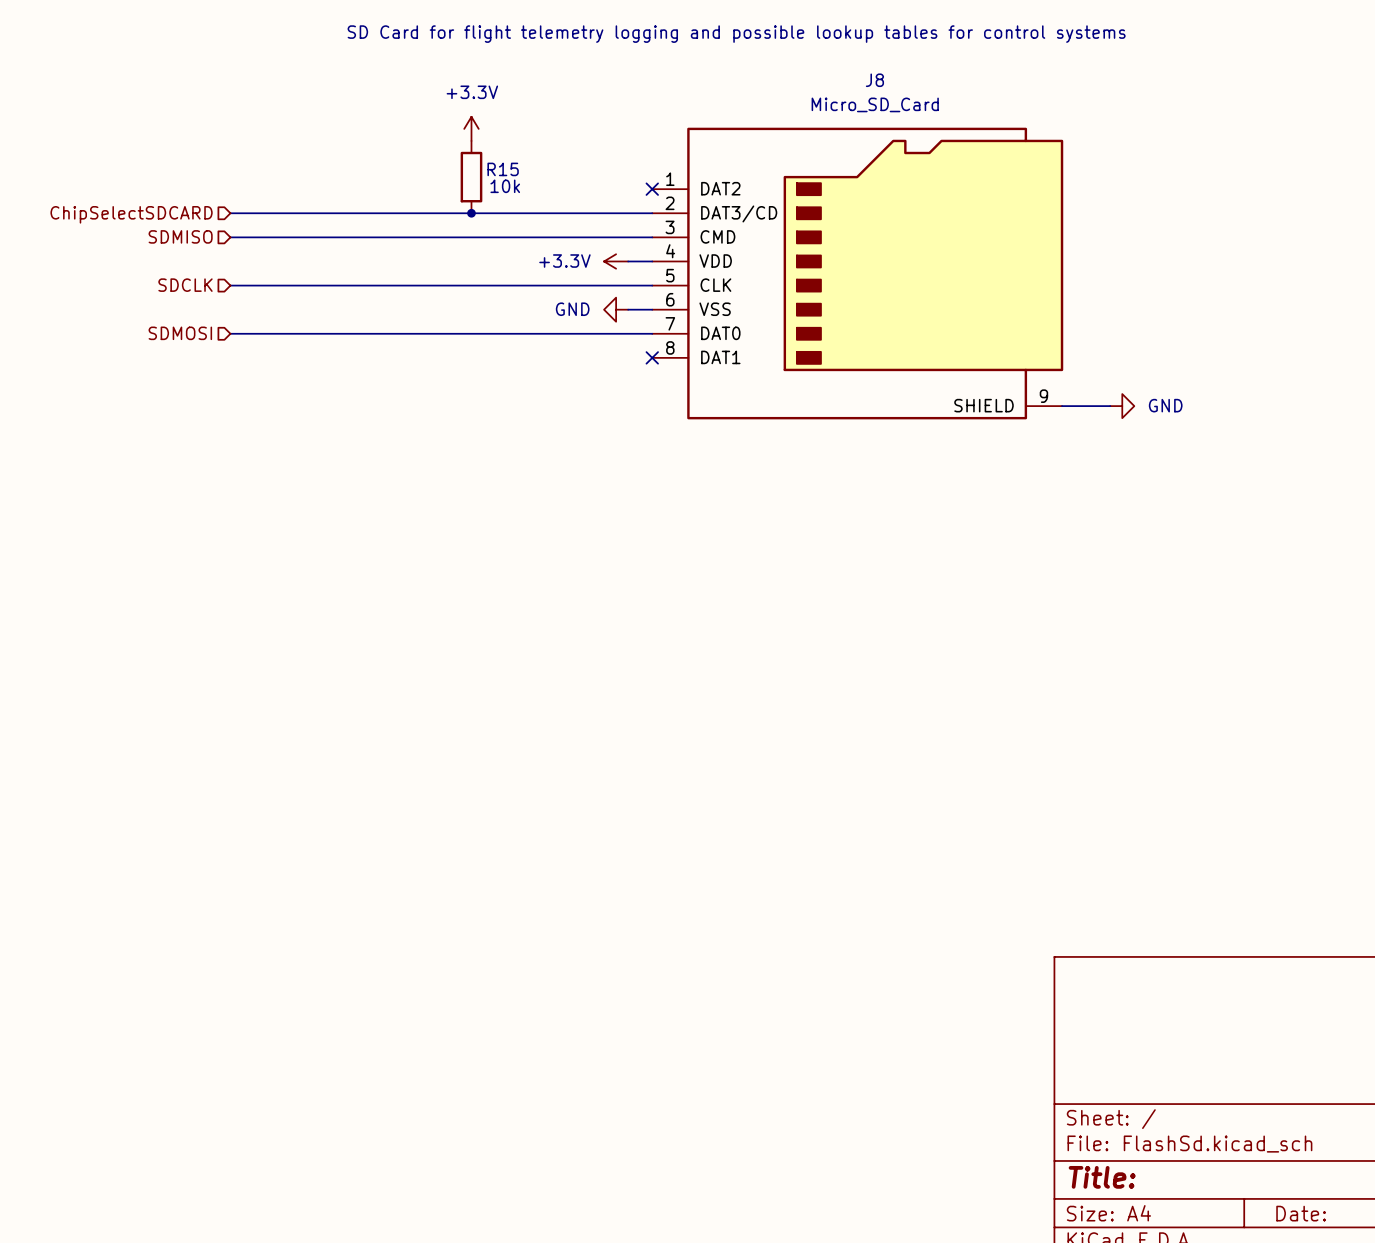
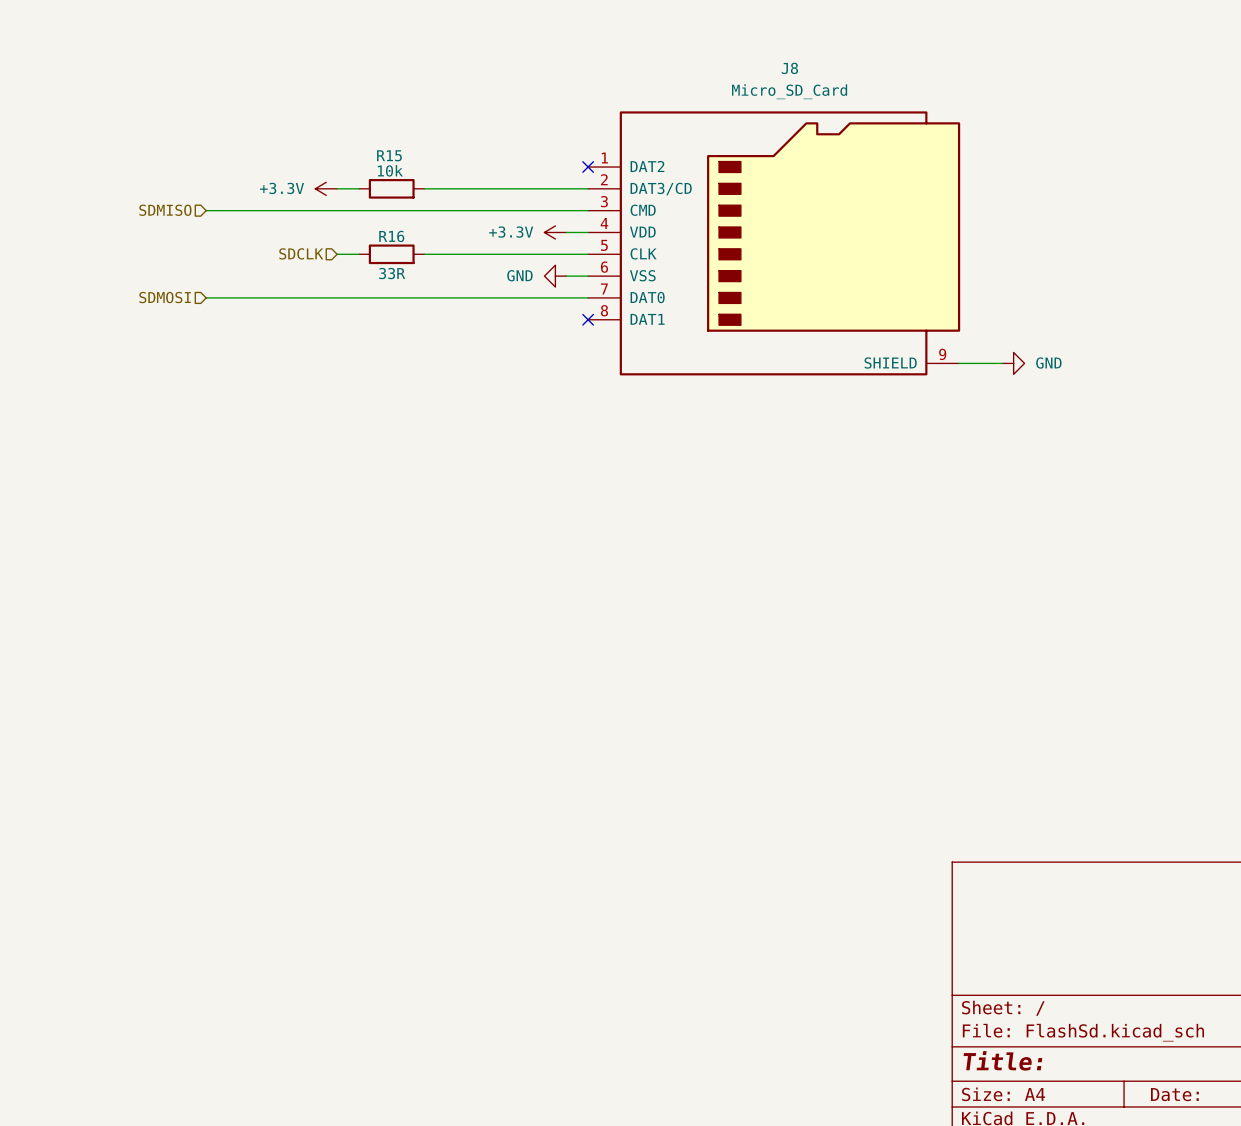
text: SD Card for flight telemetry logging and possible lookup tables for control systems (736, 34) -> none
power symbol text position: +3.3V (472, 92) -> +3.3V (282, 188)
power symbol rotation: 0° (471, 128) -> 90° counterclockwise (326, 188)
power symbol position: +3.3V (471, 128) -> +3.3V (326, 188)
R15 name position: R15 (503, 169) -> R15 (389, 155)
R15 rotation: 0° (471, 177) -> 90° clockwise (391, 188)
R15 position: (471, 177) -> (391, 188)
R15 value position: 10k (505, 186) -> 10k (390, 170)
wire: (230, 213) (375, 213) -> none
wire: (399, 213) (471, 213) -> none
junction: (471, 213) -> none
hierarchical label: ChipSelectSDCARD (131, 214) -> none
hierarchical label position: SDCLK (185, 285) -> SDCLK (301, 253)
wire: (230, 285) (375, 285) -> none
wire: (399, 285) (471, 285) -> none
R16: none -> 33R (391, 254)

